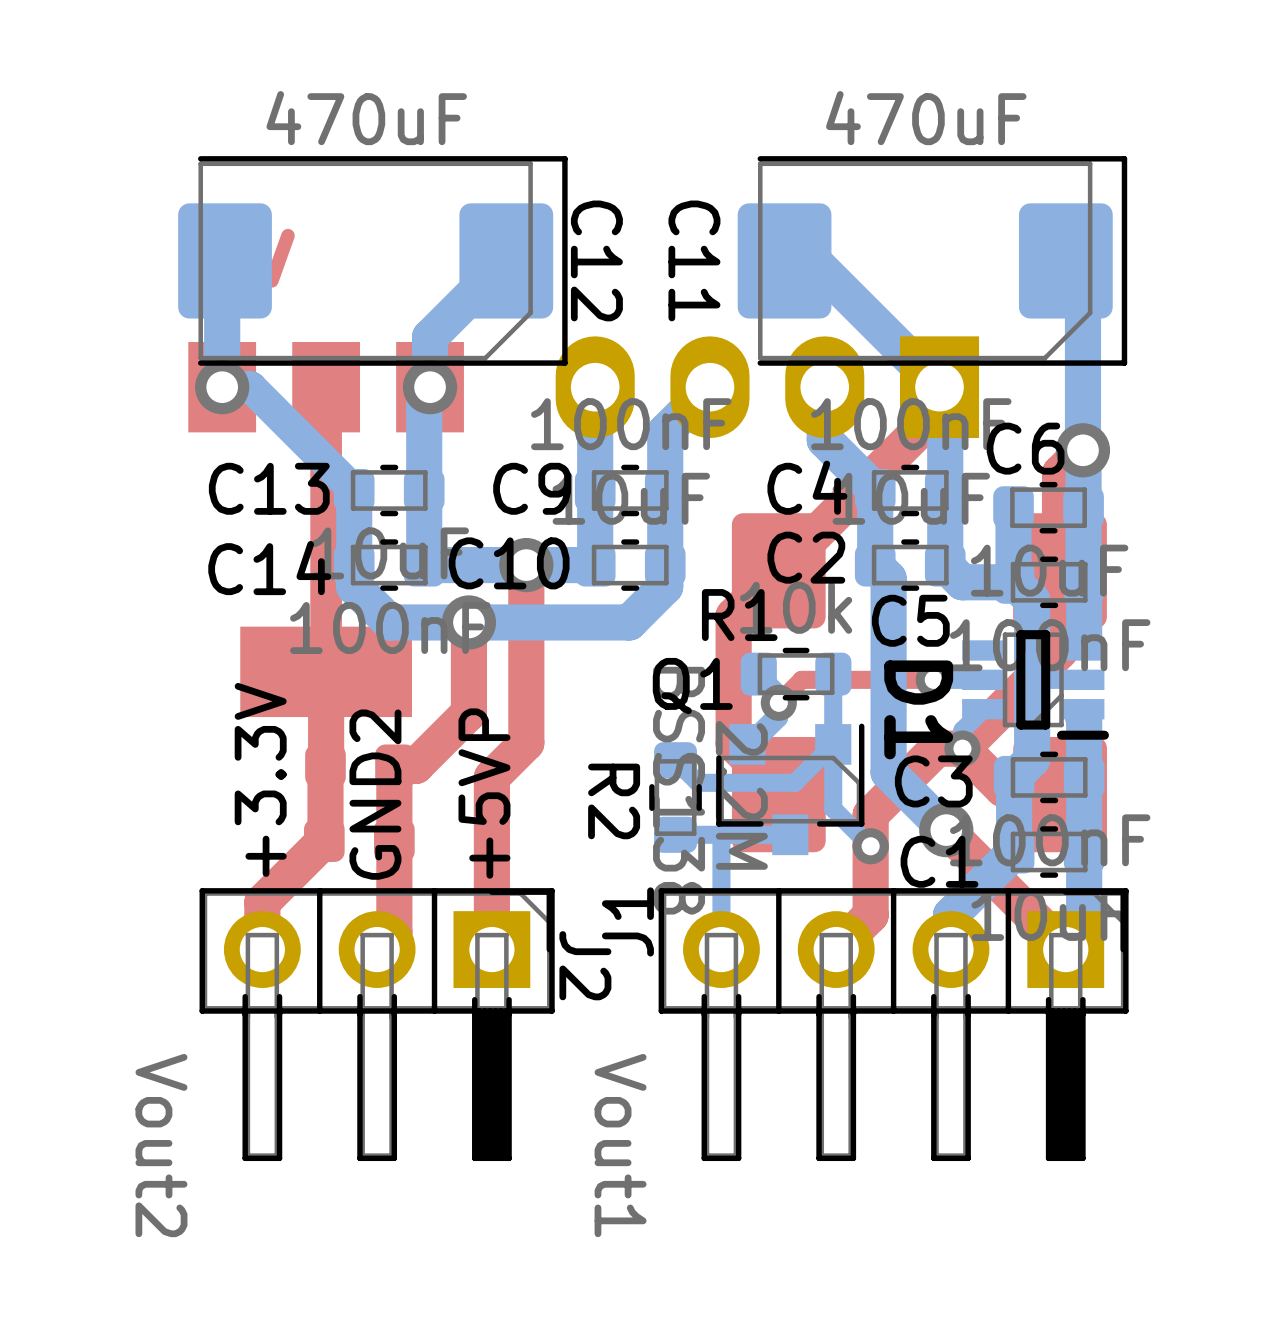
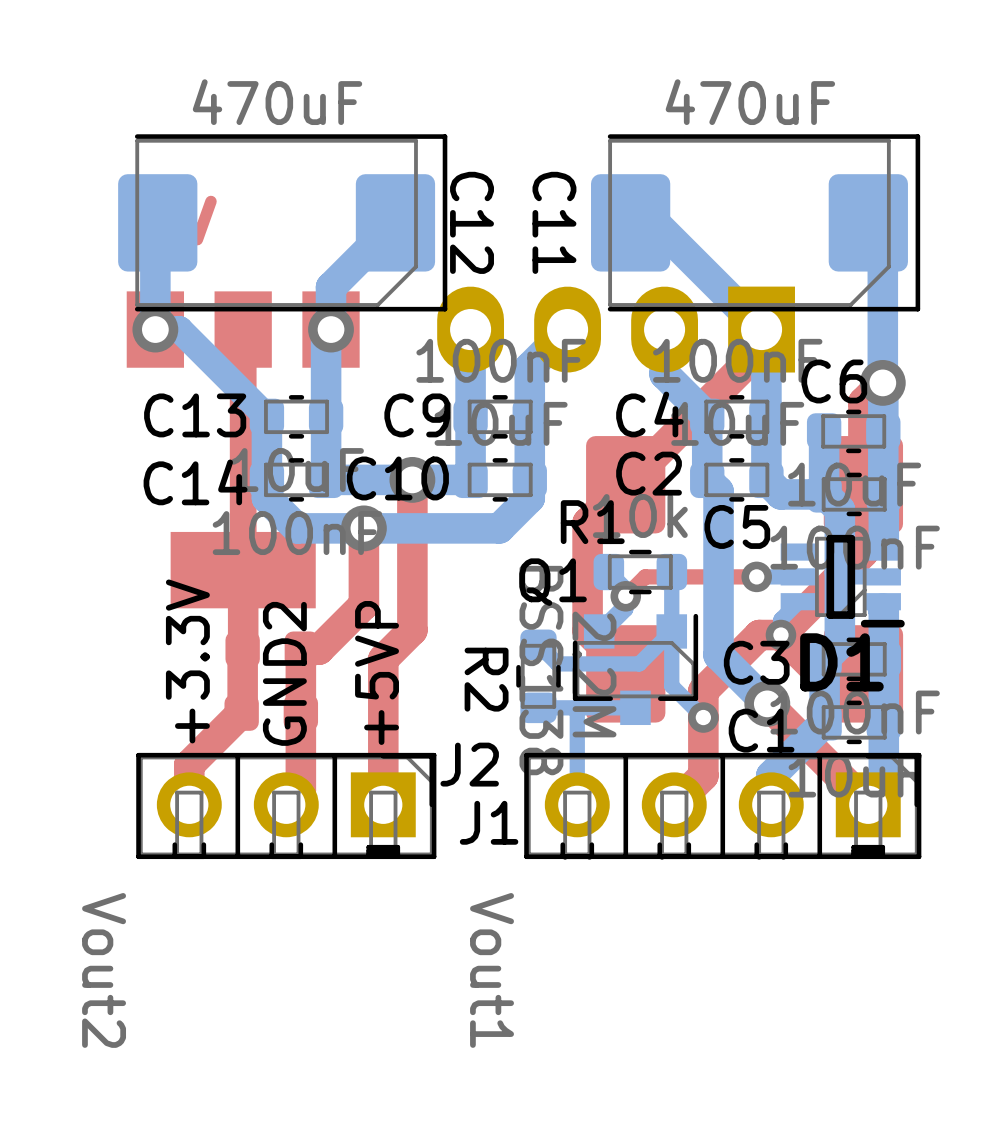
D1 name rotation: 0° (918, 709) -> 90° counterclockwise (841, 662)
J2 footprint: [199, 888, 555, 1162] -> [136, 752, 437, 860]
J1 footprint: [658, 888, 1129, 1162] -> [524, 752, 922, 861]
J1 name position: J1 (627, 921) -> J1 (489, 822)

